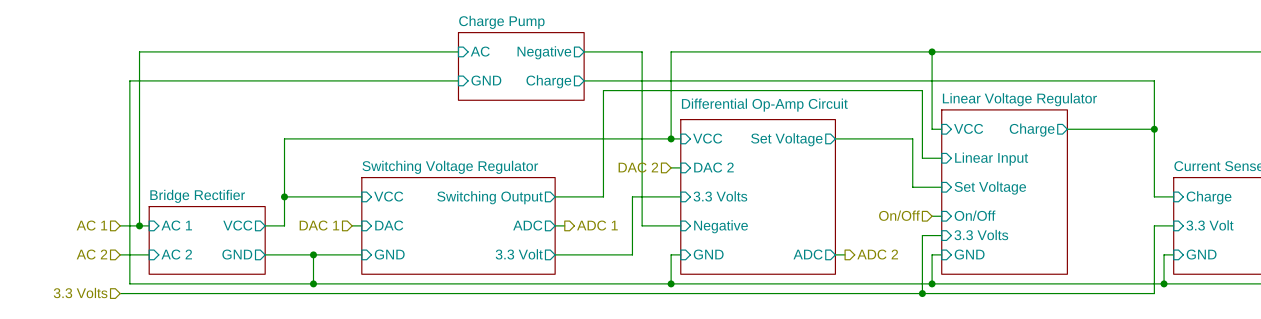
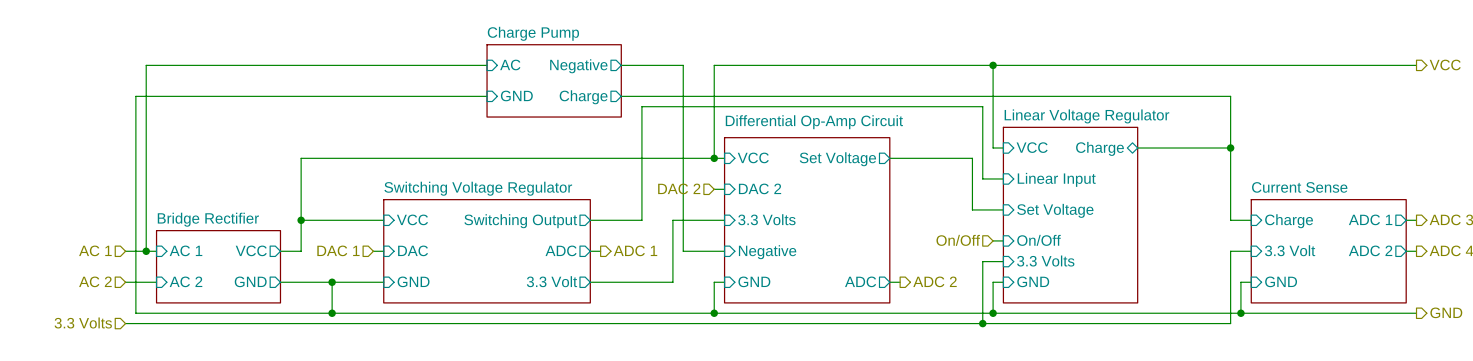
sheet pin shape: output (1032, 130) -> bidirectional (1099, 148)

